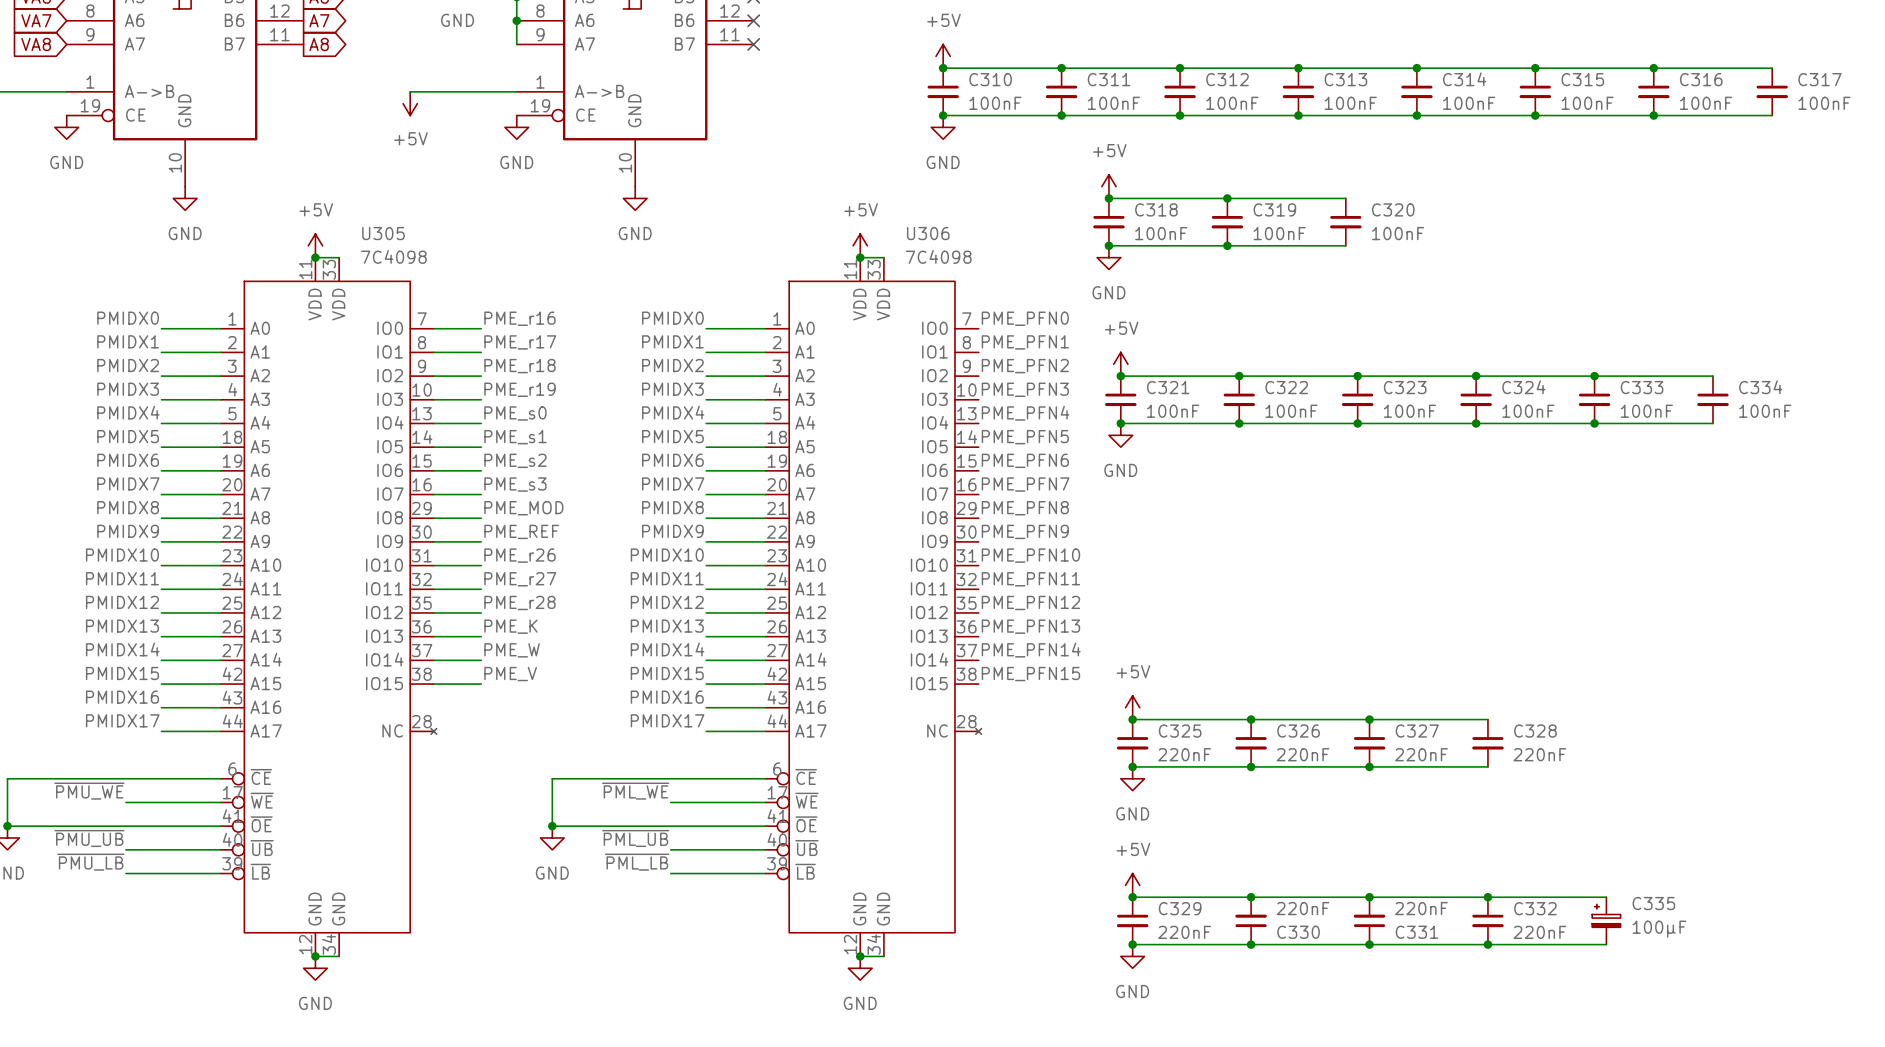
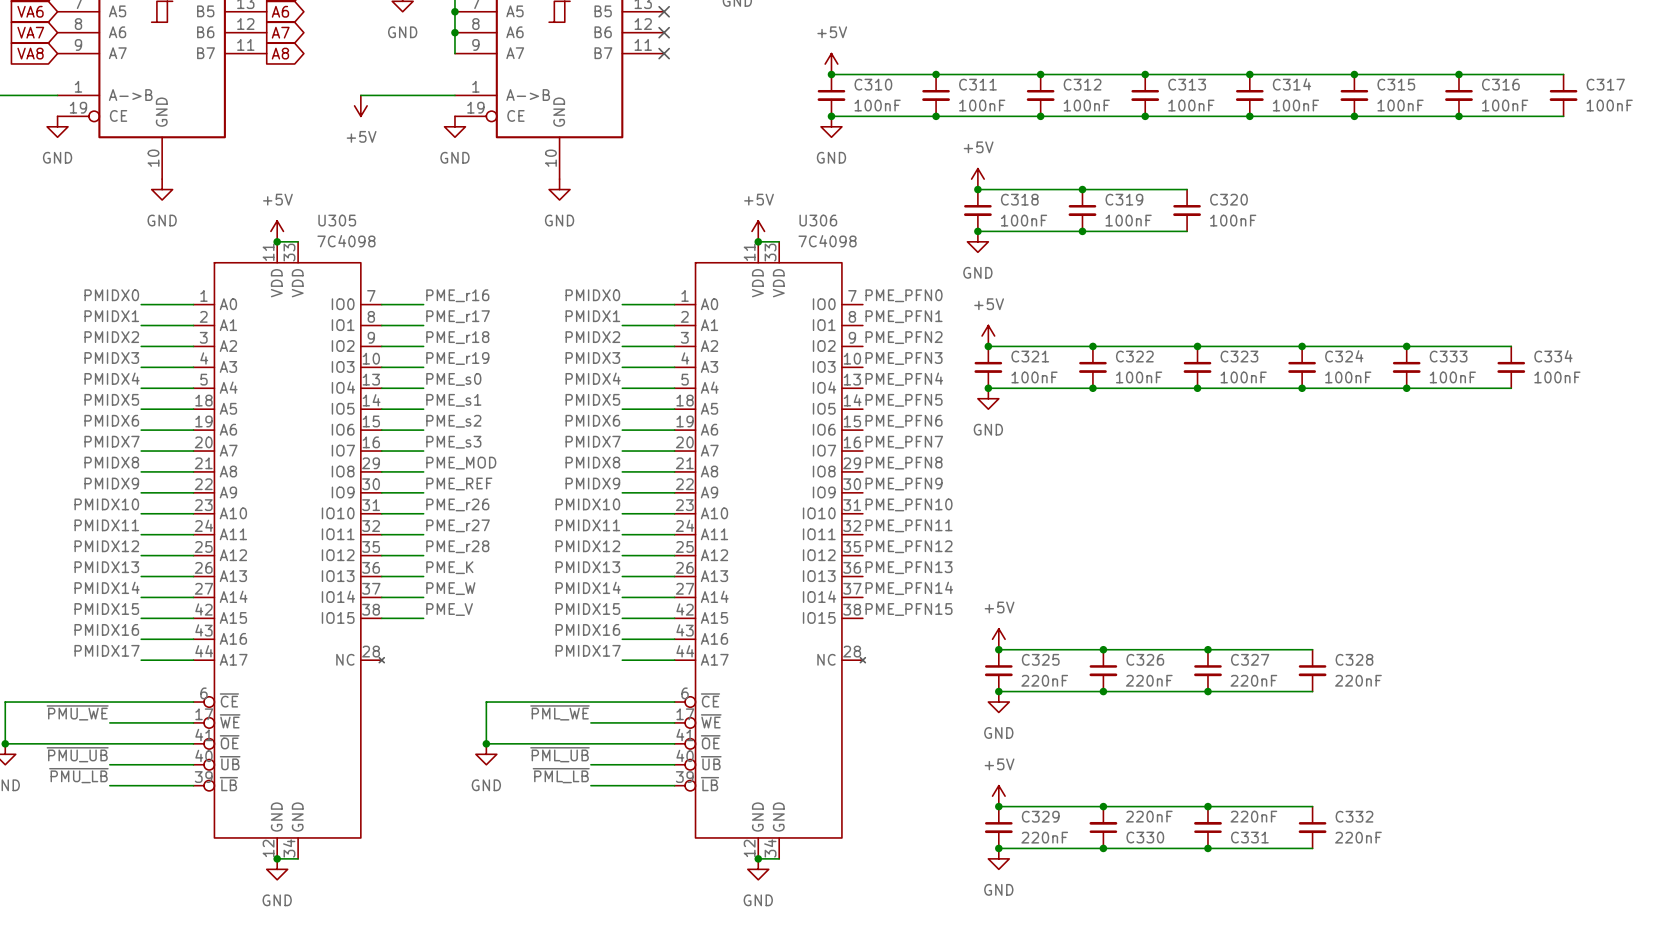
wire: (1487, 897) (1606, 897) -> none
junction: (1487, 897) -> none
C335: 100µF (1606, 920) -> none
wire: (1487, 944) (1606, 944) -> none
junction: (1487, 944) -> none

